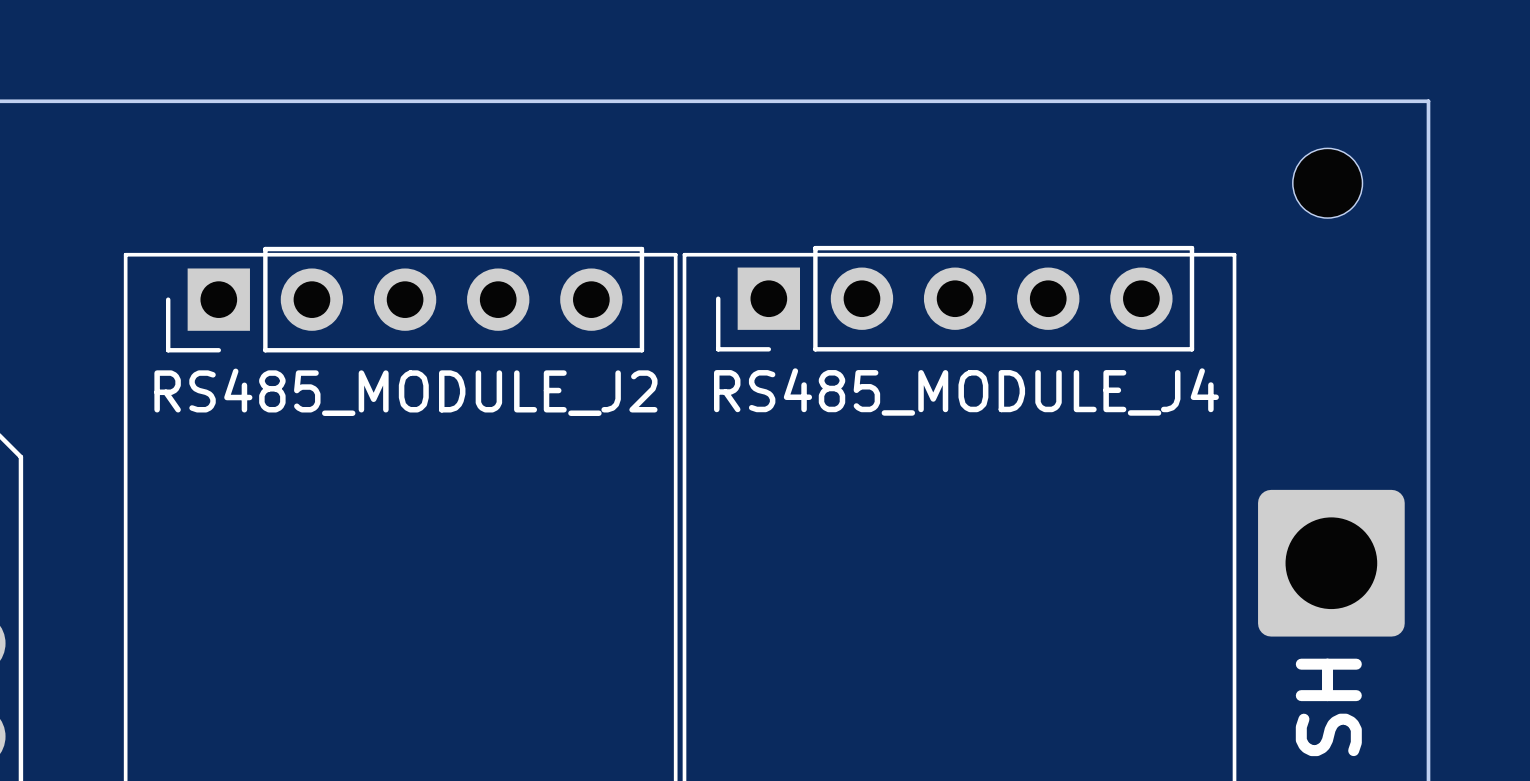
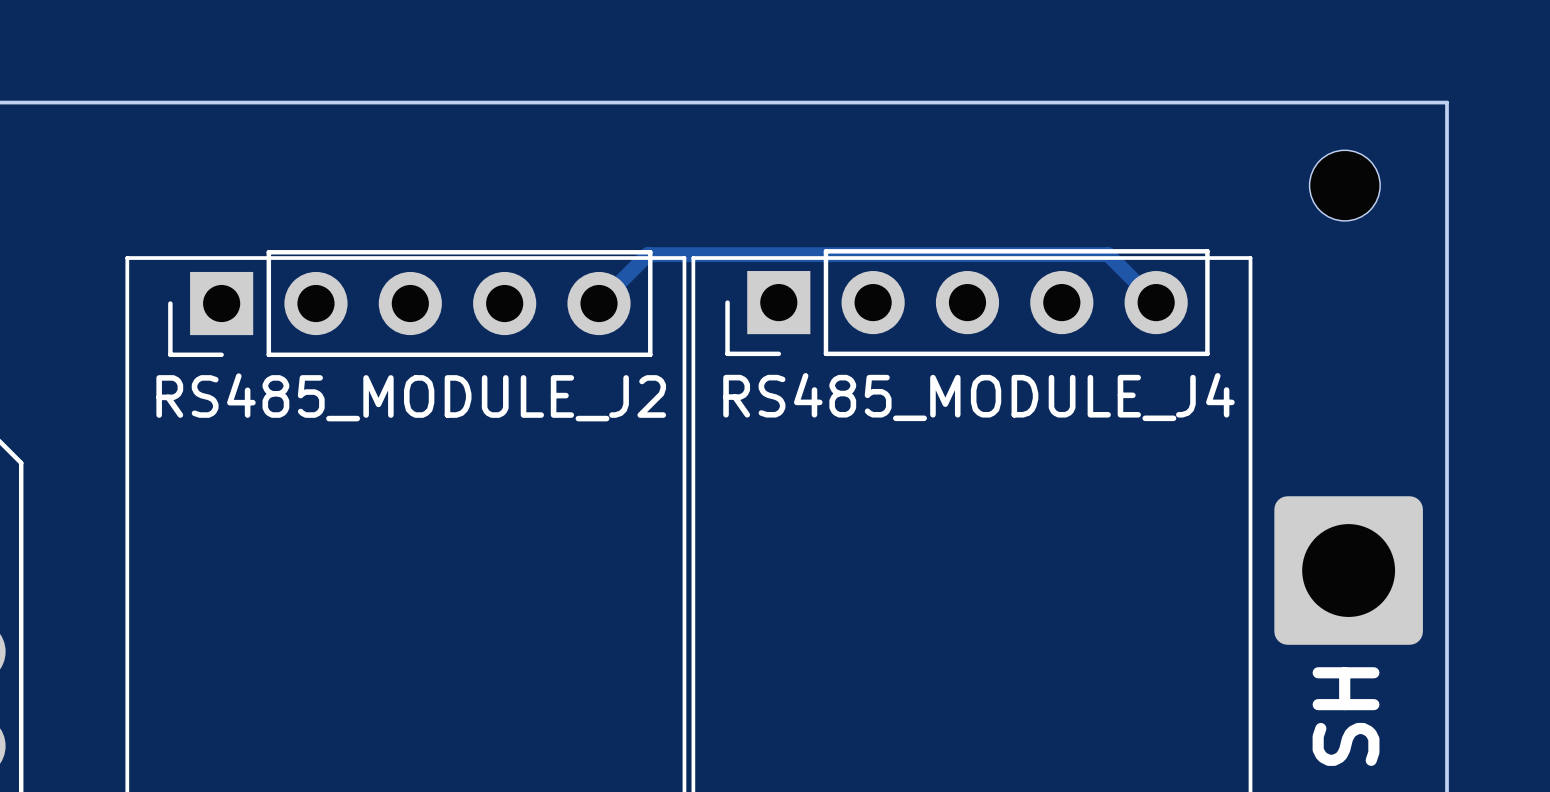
track: none -> (1156, 302) (1108, 254) (647, 254) (599, 303)

